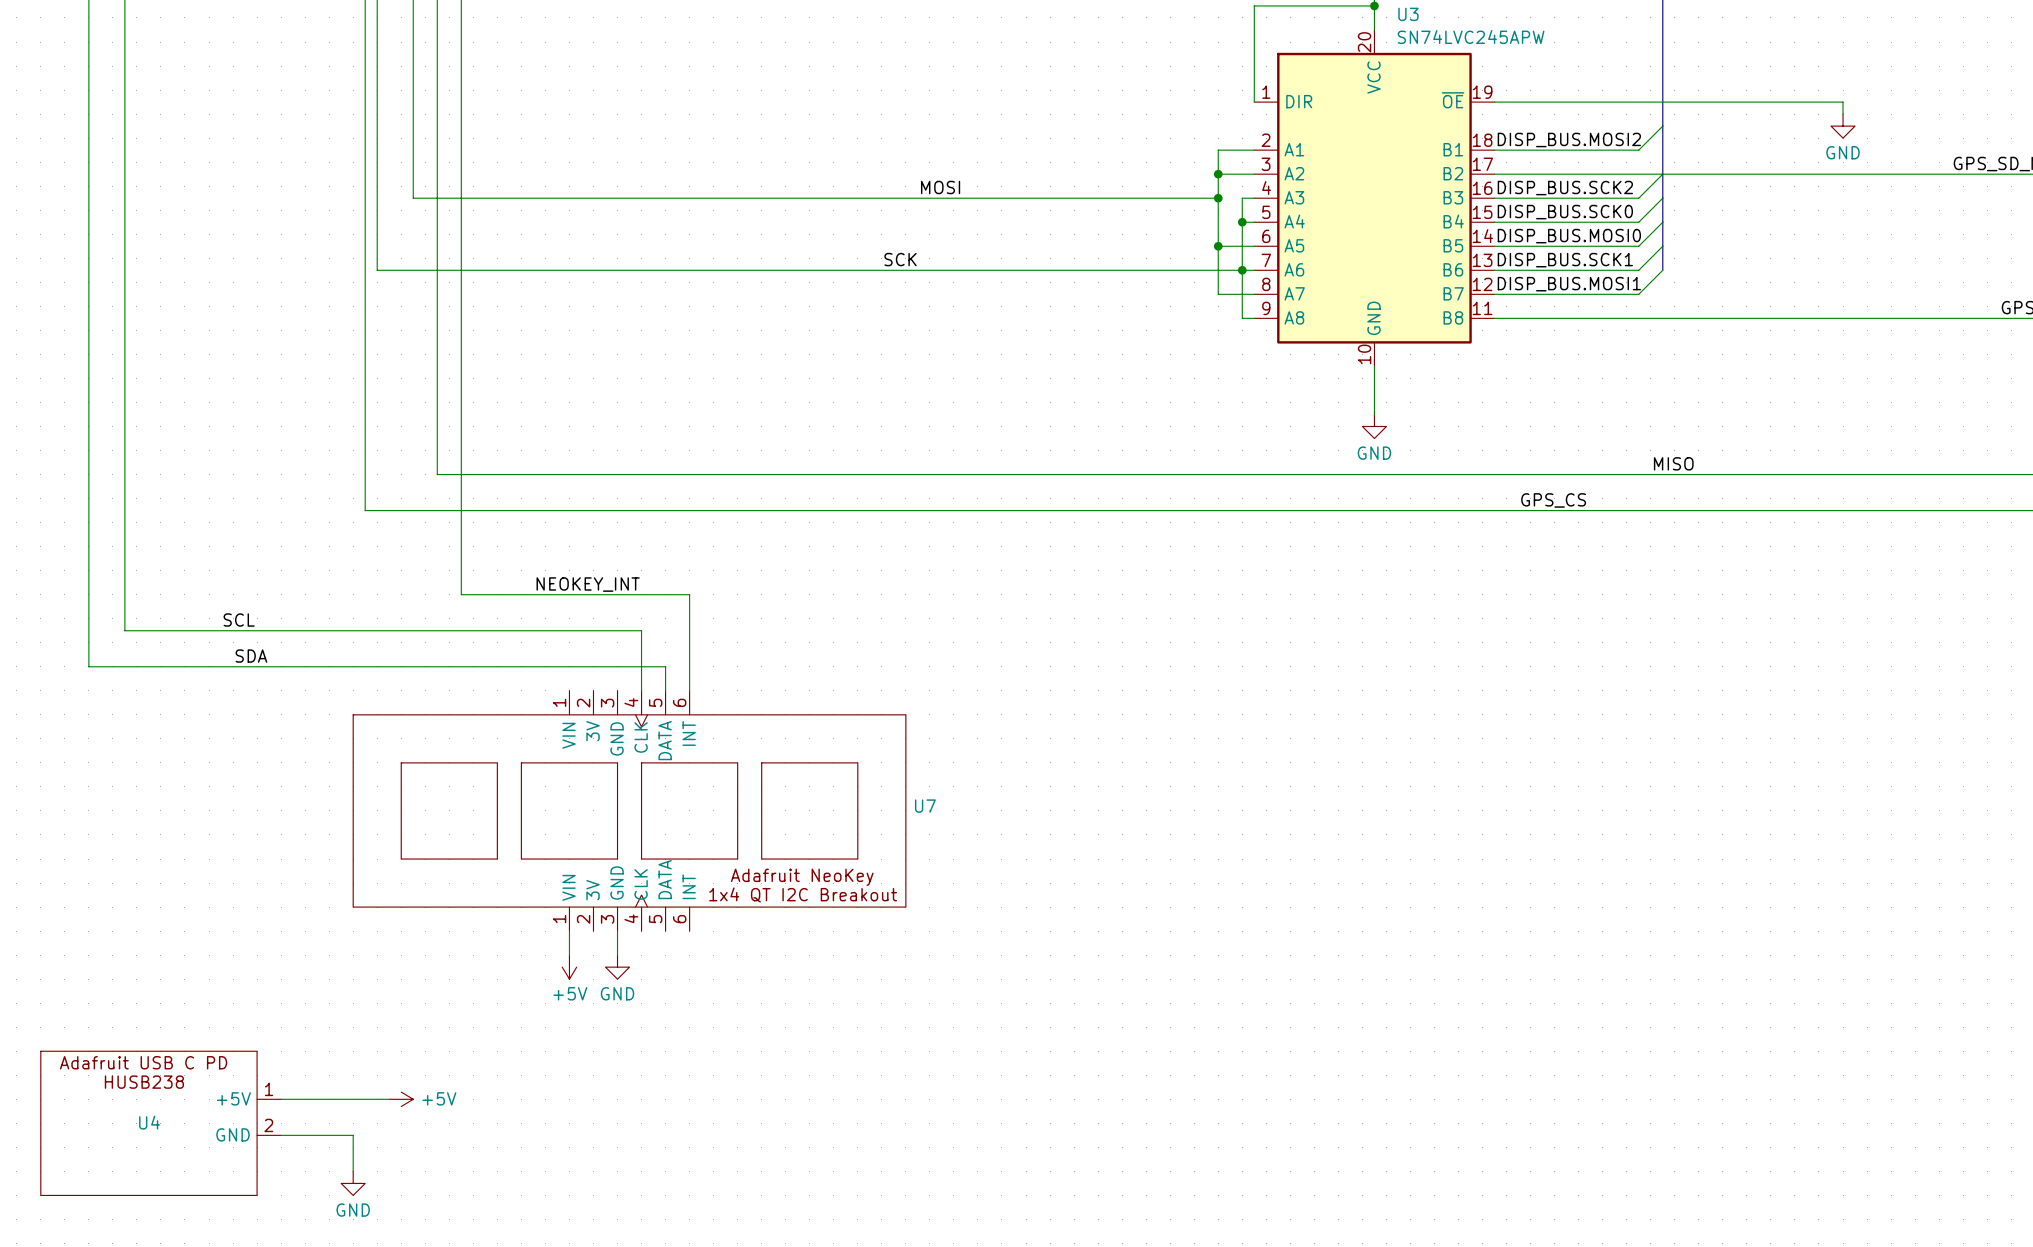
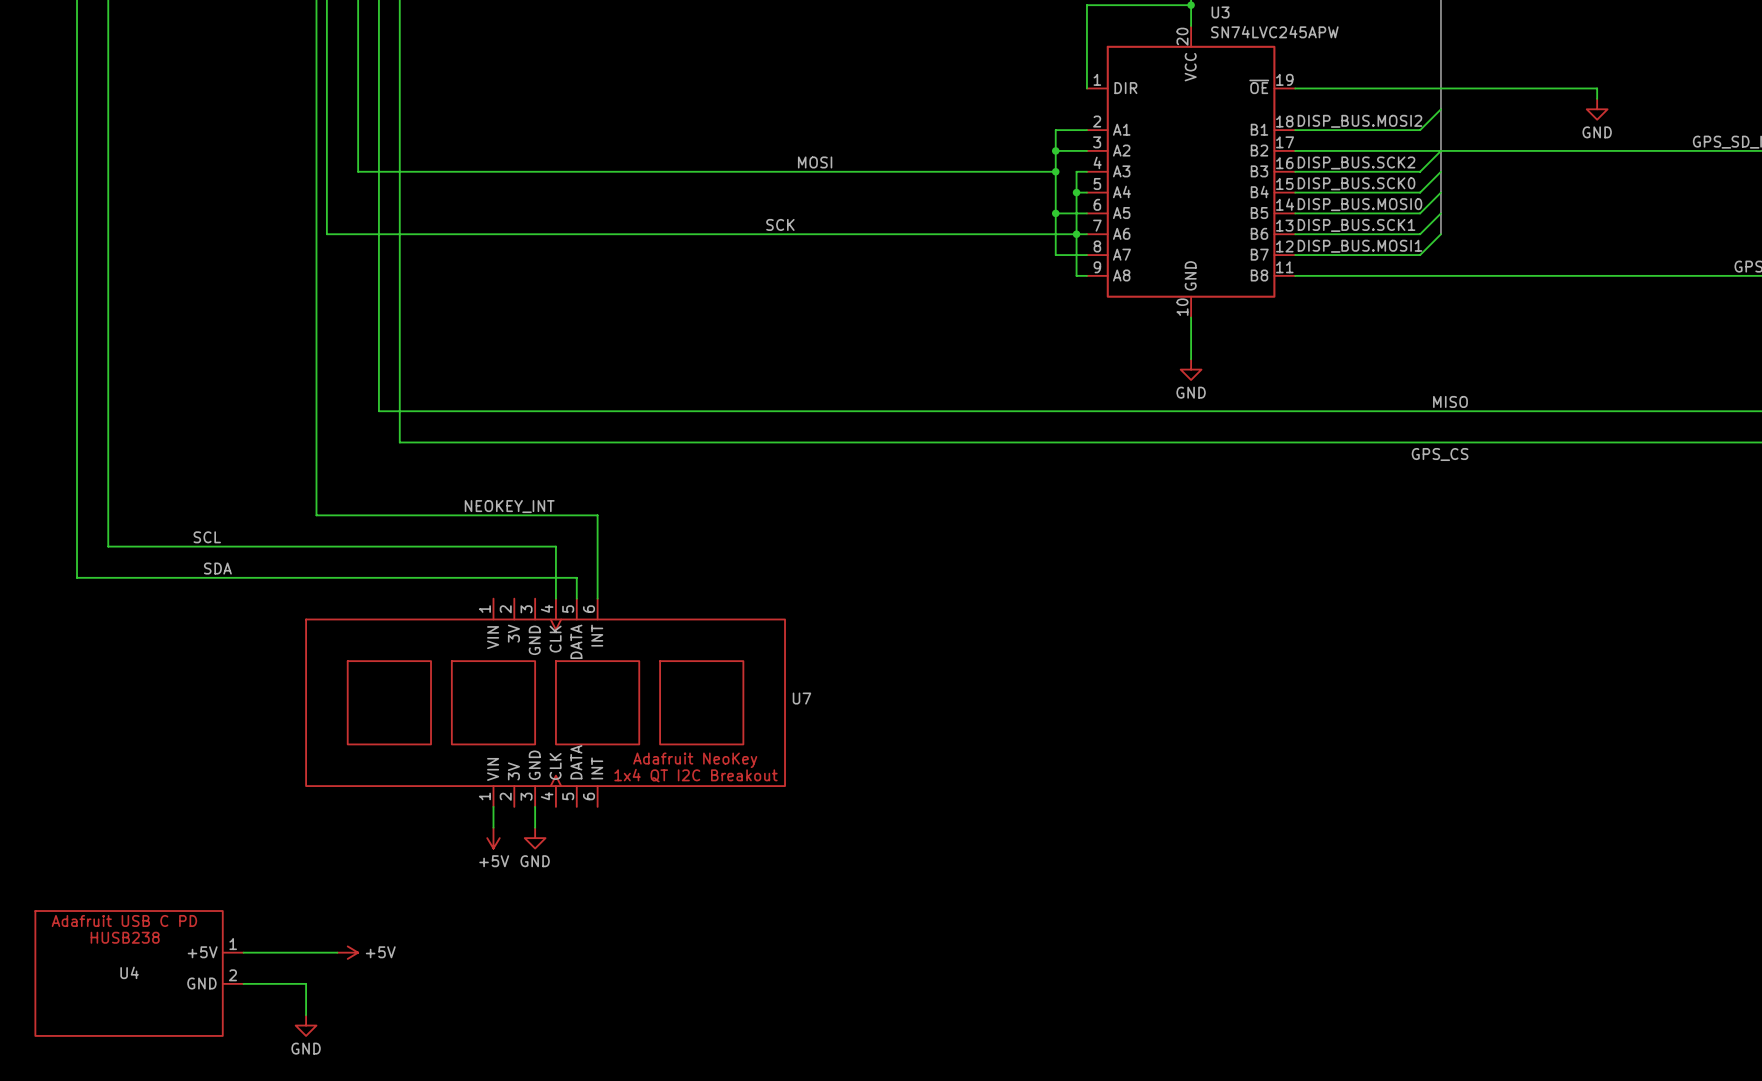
label position: GPS_CS (1553, 500) -> GPS_CS (1440, 454)
wire: (365, 510) (461, 510) (461, 594) -> (316, 442) (316, 515) (399, 515)

